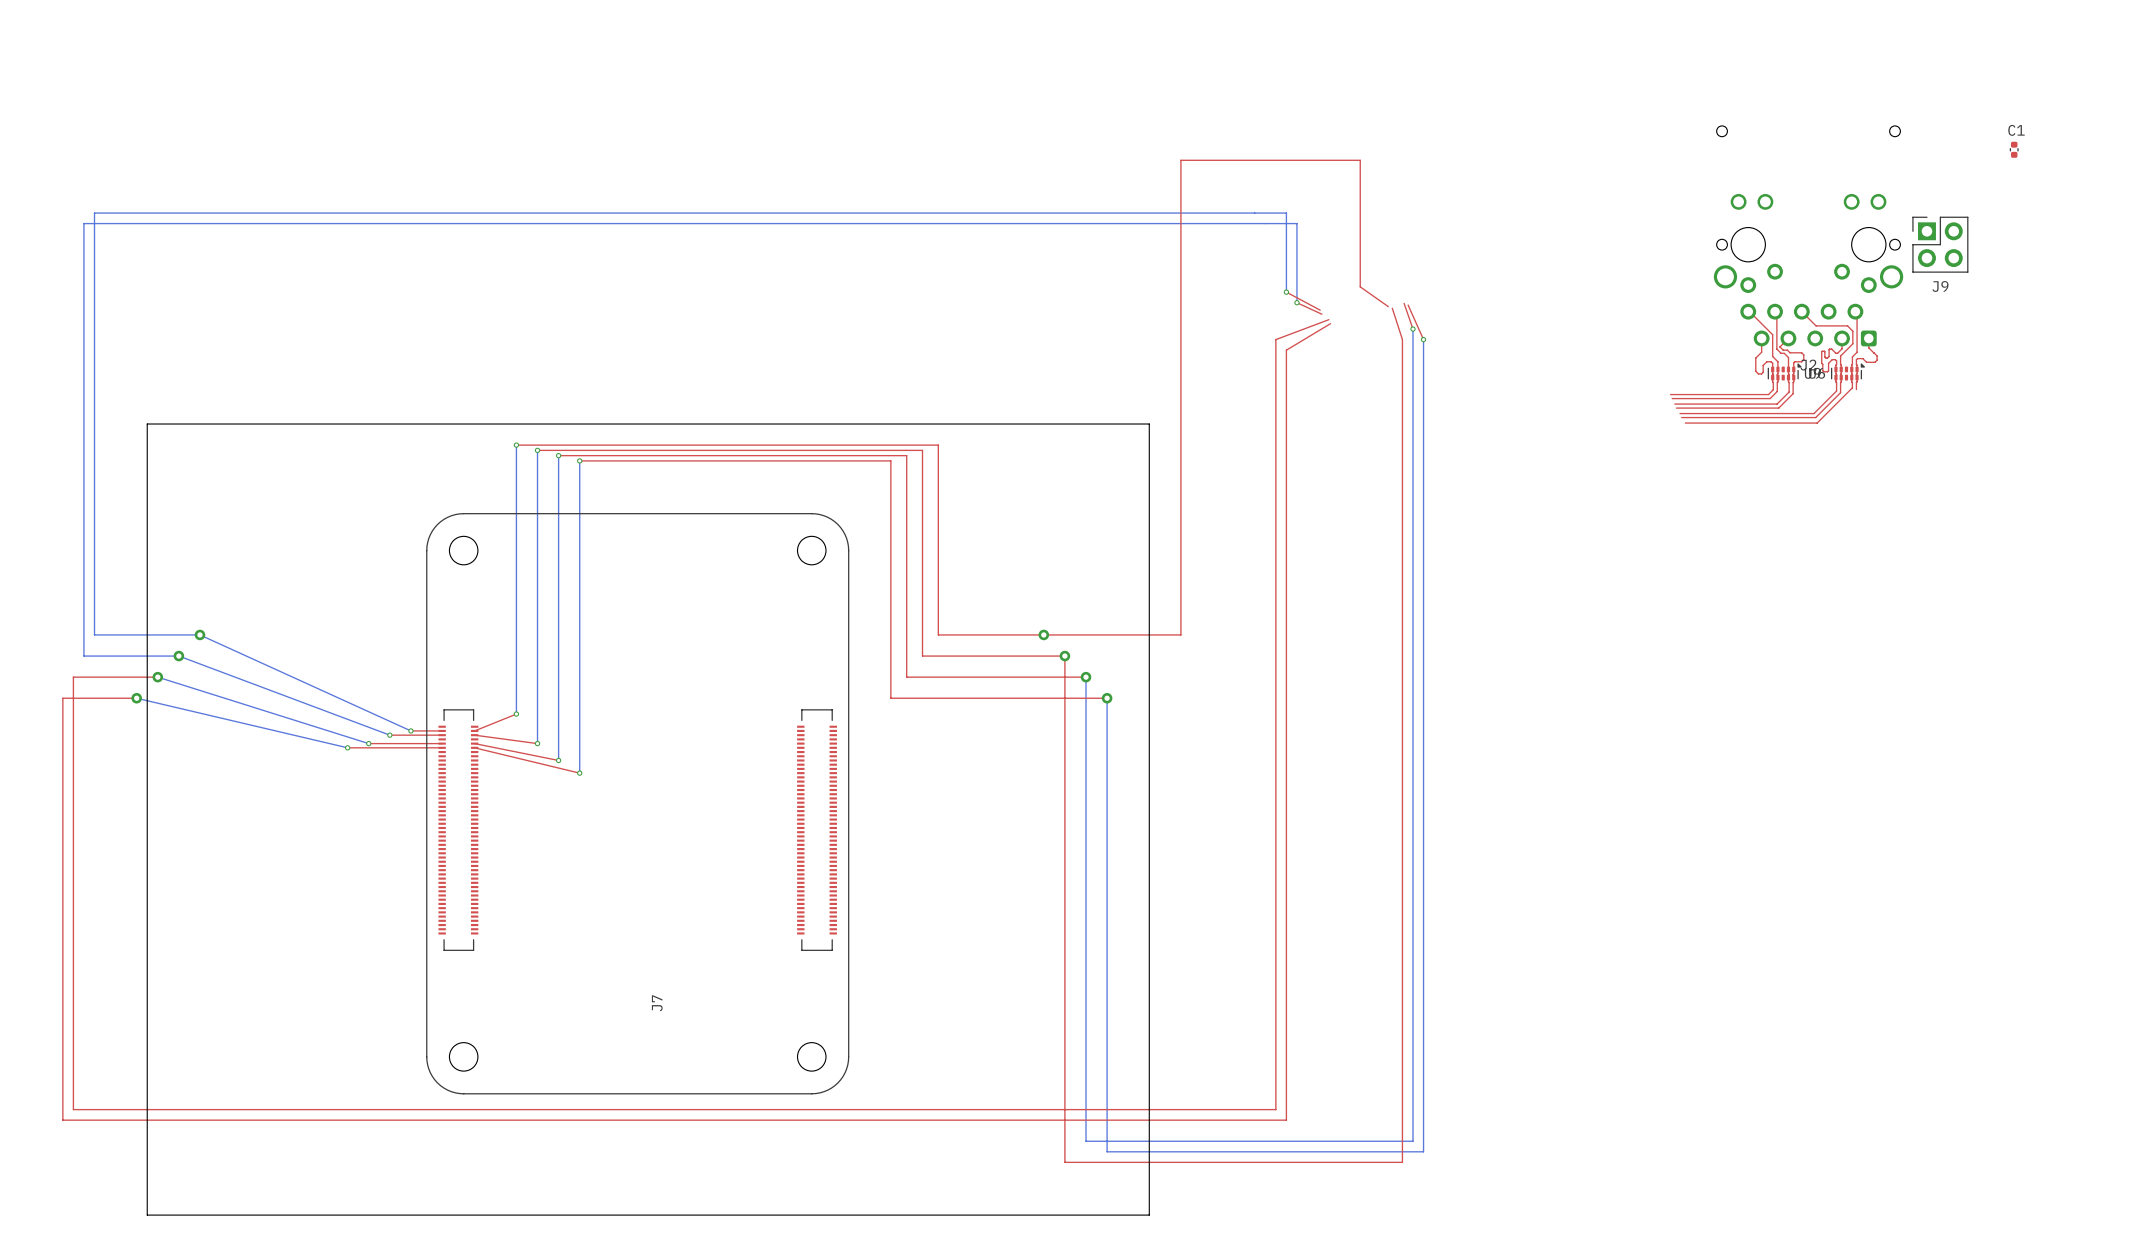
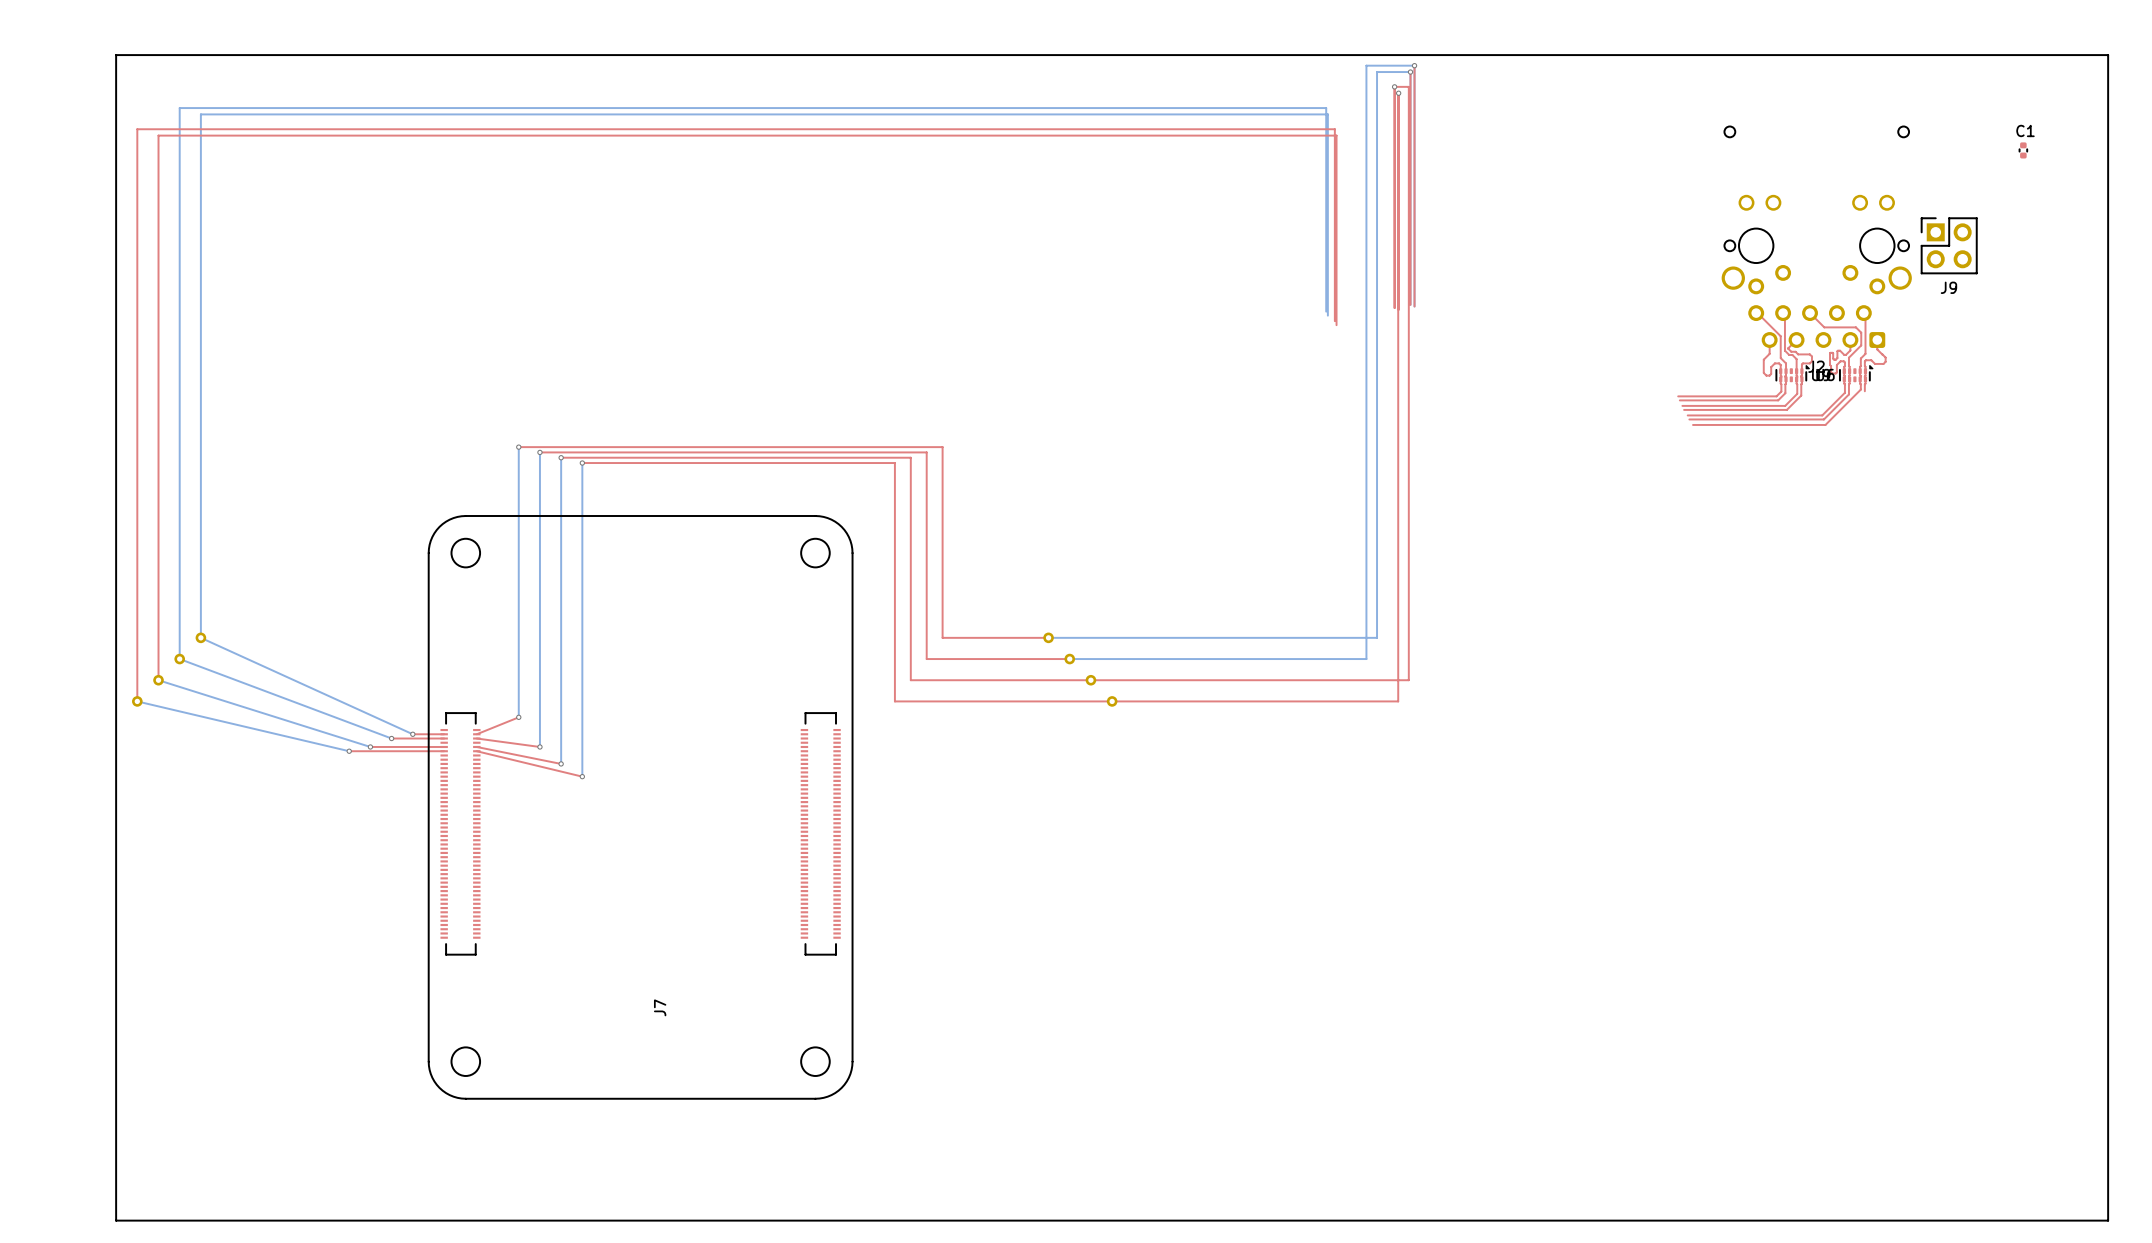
via: none -> (1414, 65)
via: none -> (1410, 72)
via: none -> (1394, 86)
via: none -> (1398, 93)
top track: (1286, 292) (1320, 310) -> none
bottom track: (1286, 292) (1286, 213) (94, 213) (94, 634) (199, 634) -> (1327, 315) (1327, 114) (200, 114) (200, 637)
via: (1286, 292) -> none
top track: (1296, 302) (1321, 314) -> none
bottom track: (1296, 302) (1296, 223) (83, 223) (83, 656) (178, 656) -> (1326, 311) (1326, 108) (179, 108) (179, 659)
via: (1296, 302) -> none
top track: (1404, 303) (1412, 329) -> (1410, 304) (1410, 72)
bottom track: none -> (1410, 304) (1410, 72) (1377, 72) (1377, 637) (1048, 637)
top track: (1408, 305) (1423, 339) -> (1414, 306) (1414, 65)
bottom track: none -> (1414, 306) (1414, 65) (1366, 65) (1366, 659) (1069, 659)
top track: (1388, 306) (1360, 286) (1360, 160) (1180, 160) (1180, 634) (1043, 634) -> none
top track: (1392, 308) (1402, 339) -> (1394, 308) (1394, 86) (1408, 86) (1408, 341)
top track: none -> (1398, 309) (1398, 93) (1398, 701) (1112, 701)
top track: (1328, 319) (1275, 339) (1275, 1109) (73, 1109) (73, 677) (157, 677) -> (1336, 325) (1336, 135) (158, 135) (158, 680)
top track: (1330, 323) (1286, 350) (1286, 1120) (62, 1120) (62, 698) (136, 698) -> (1334, 321) (1334, 129) (137, 129) (137, 701)
bottom track: (1412, 329) (1412, 1141) (1086, 1141) (1086, 677) -> none
via: (1412, 329) -> none
bottom track: (1423, 339) (1423, 1151) (1107, 1151) (1107, 698) -> none
via: (1423, 339) -> none
top track: (1064, 656) (1064, 1162) (1402, 1162) (1402, 677) -> (1090, 680) (1408, 680)
board edge: (147, 1215) (147, 424) (1149, 424) (1149, 1215) -> (147, 1220) (116, 1220) (116, 55) (2108, 55) (2108, 1220) (1154, 1220)

